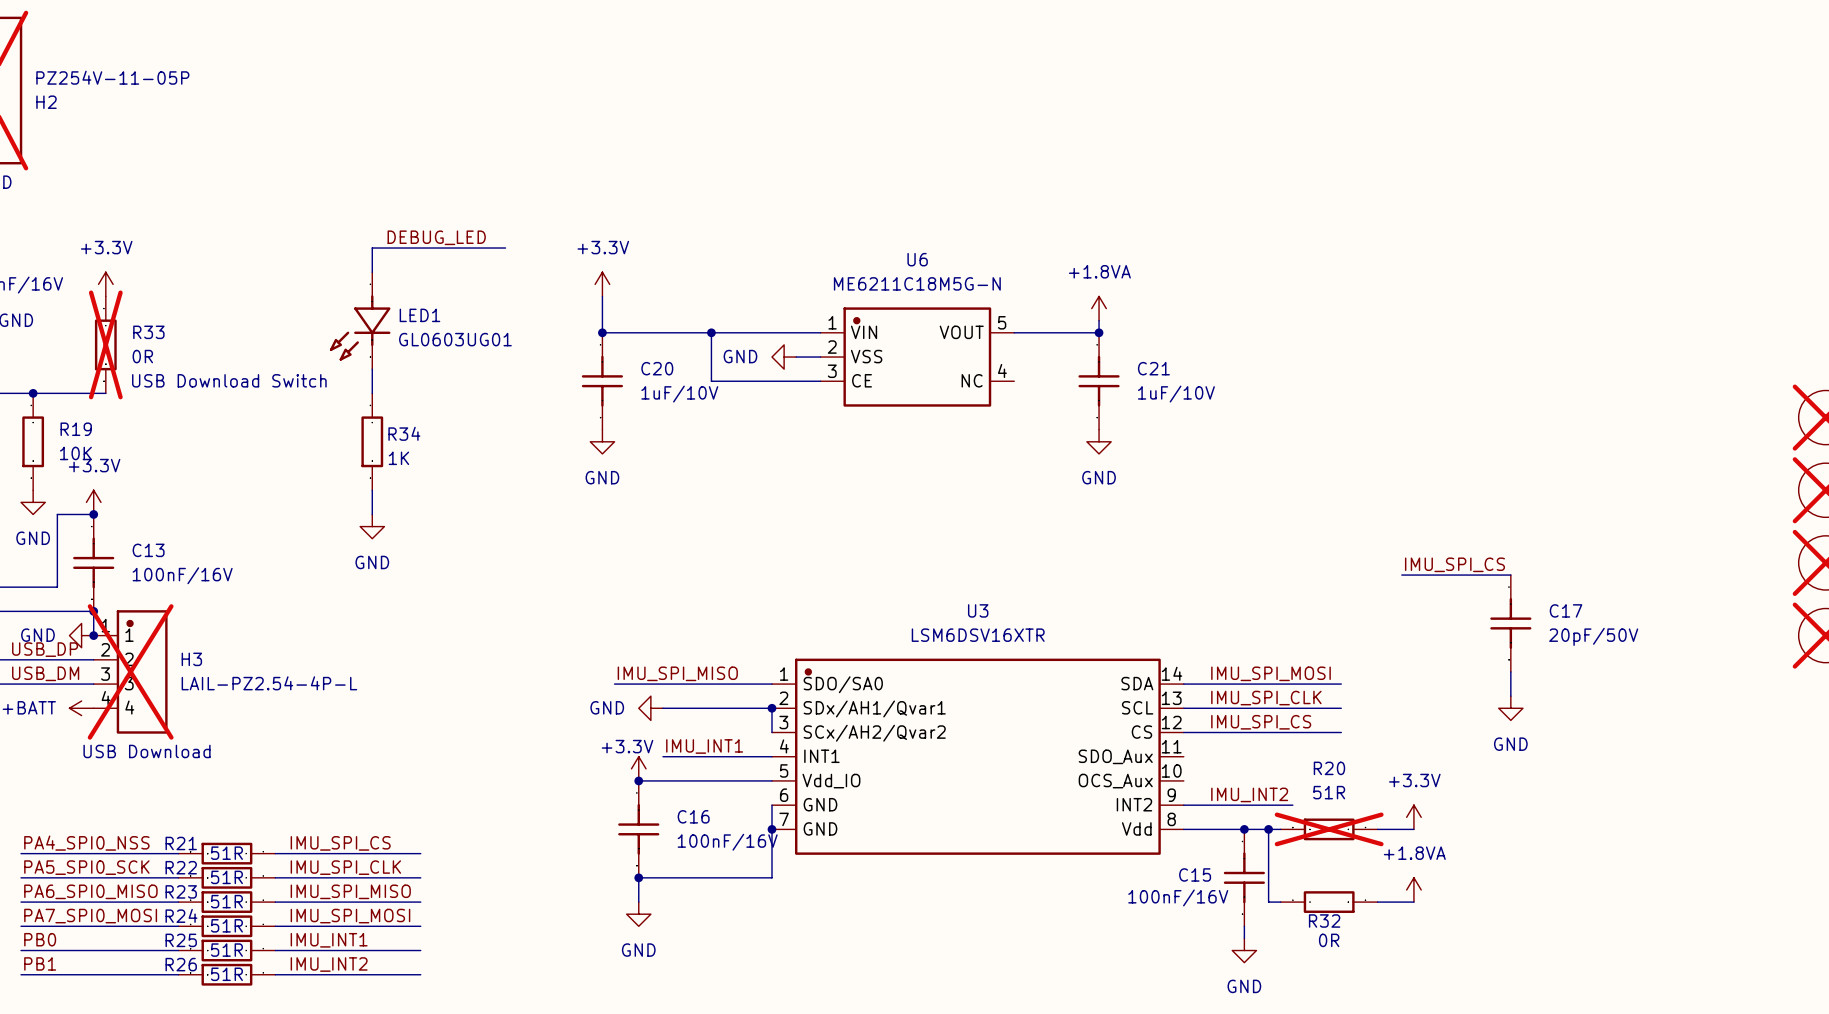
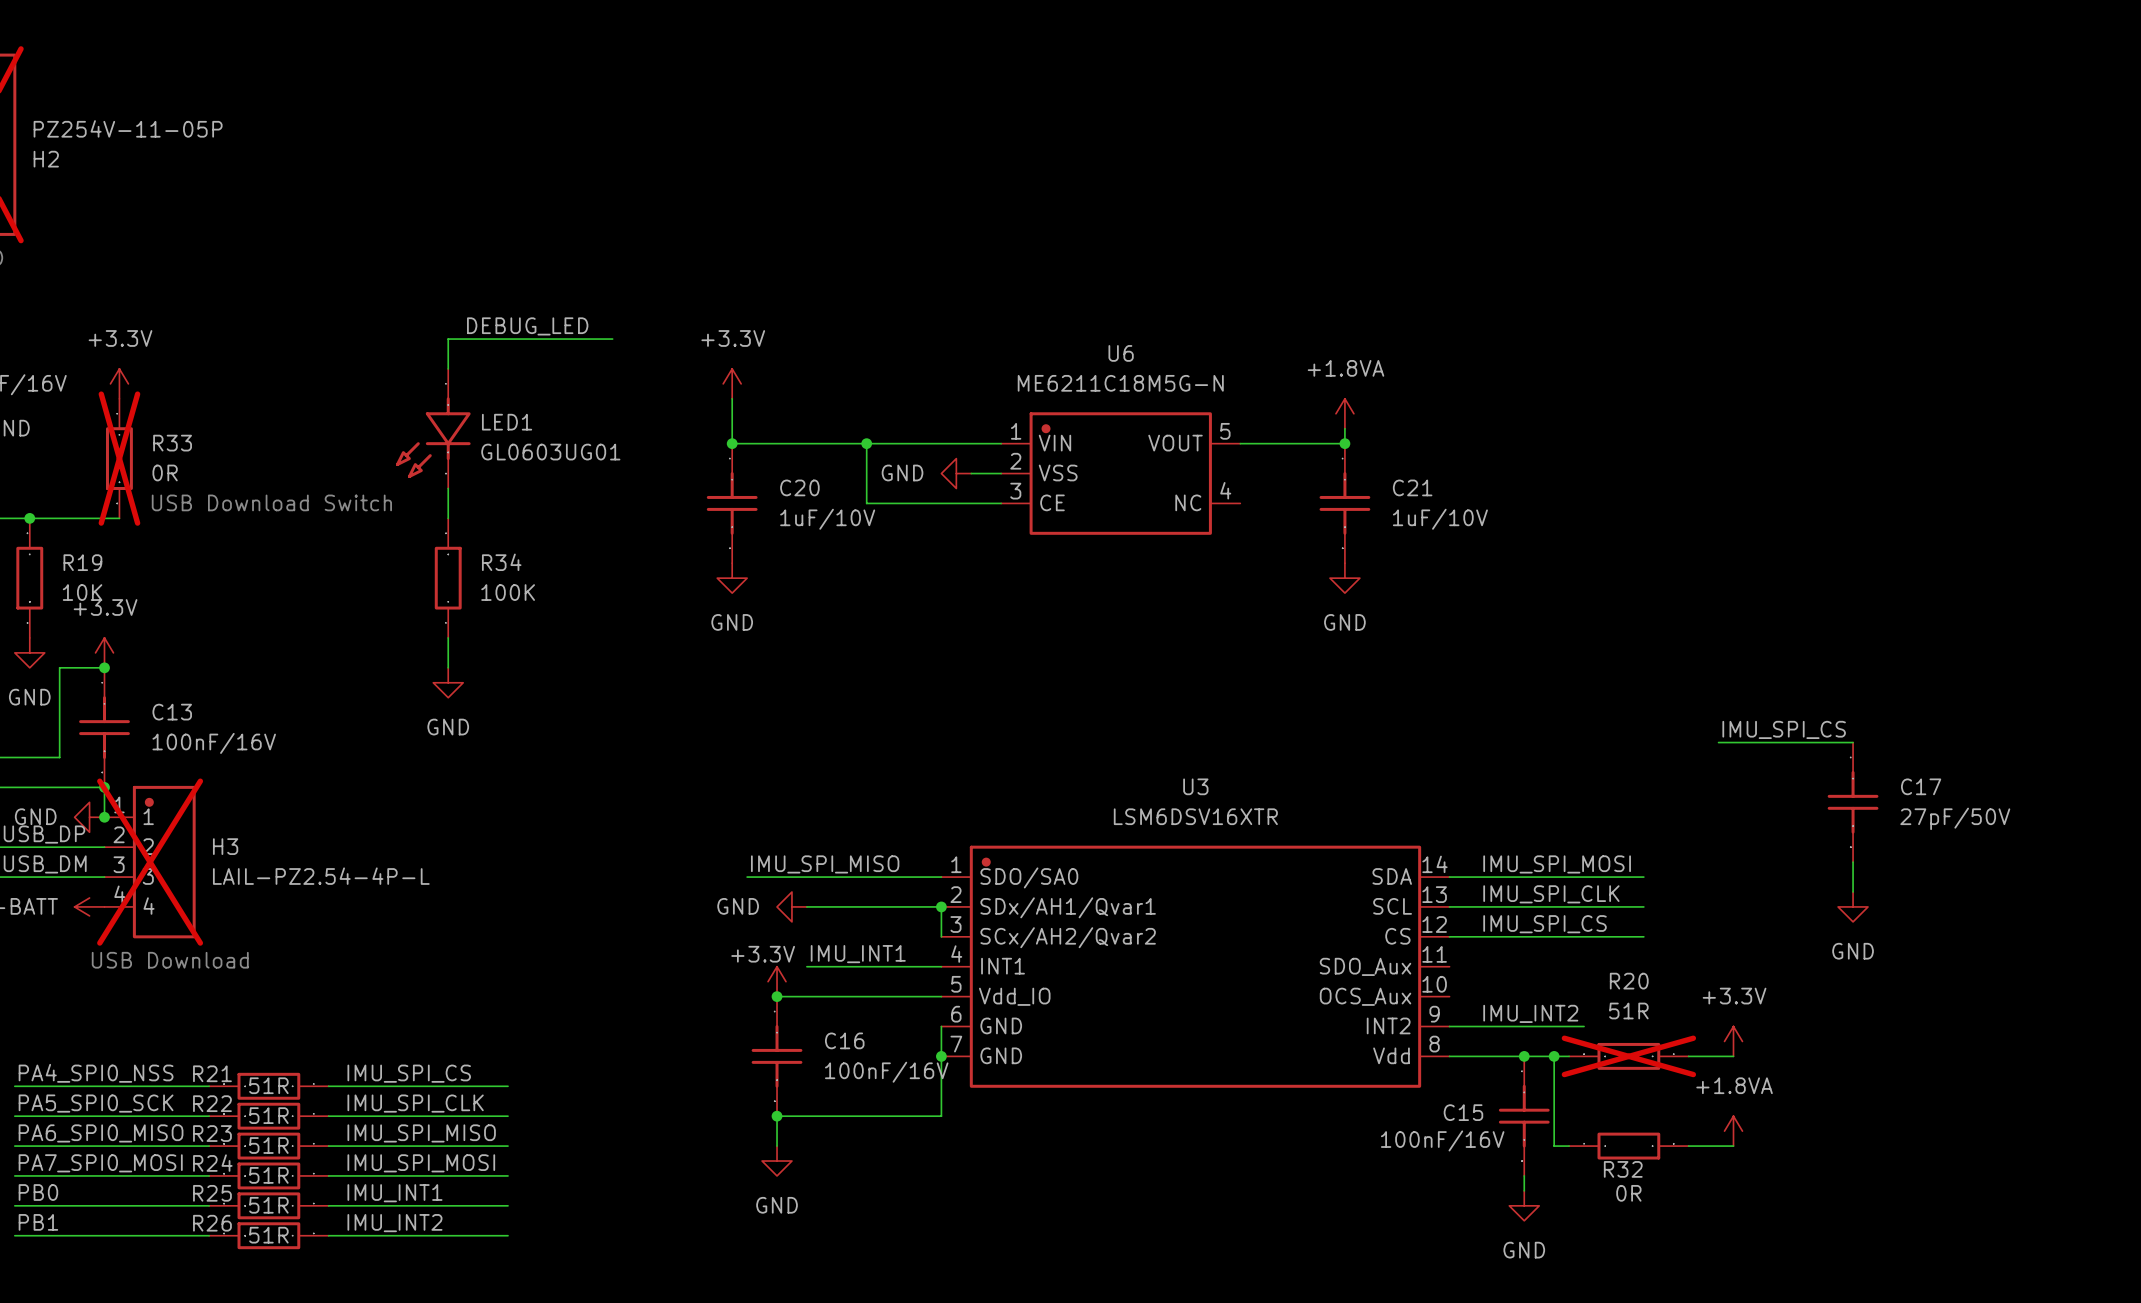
R34 rotation: 0° (372, 441) -> 180° (448, 578)
R34 value: 1K (398, 458) -> 100K (508, 592)
C17 value: 20pF/50V (1593, 636) -> 27pF/50V (1955, 818)

